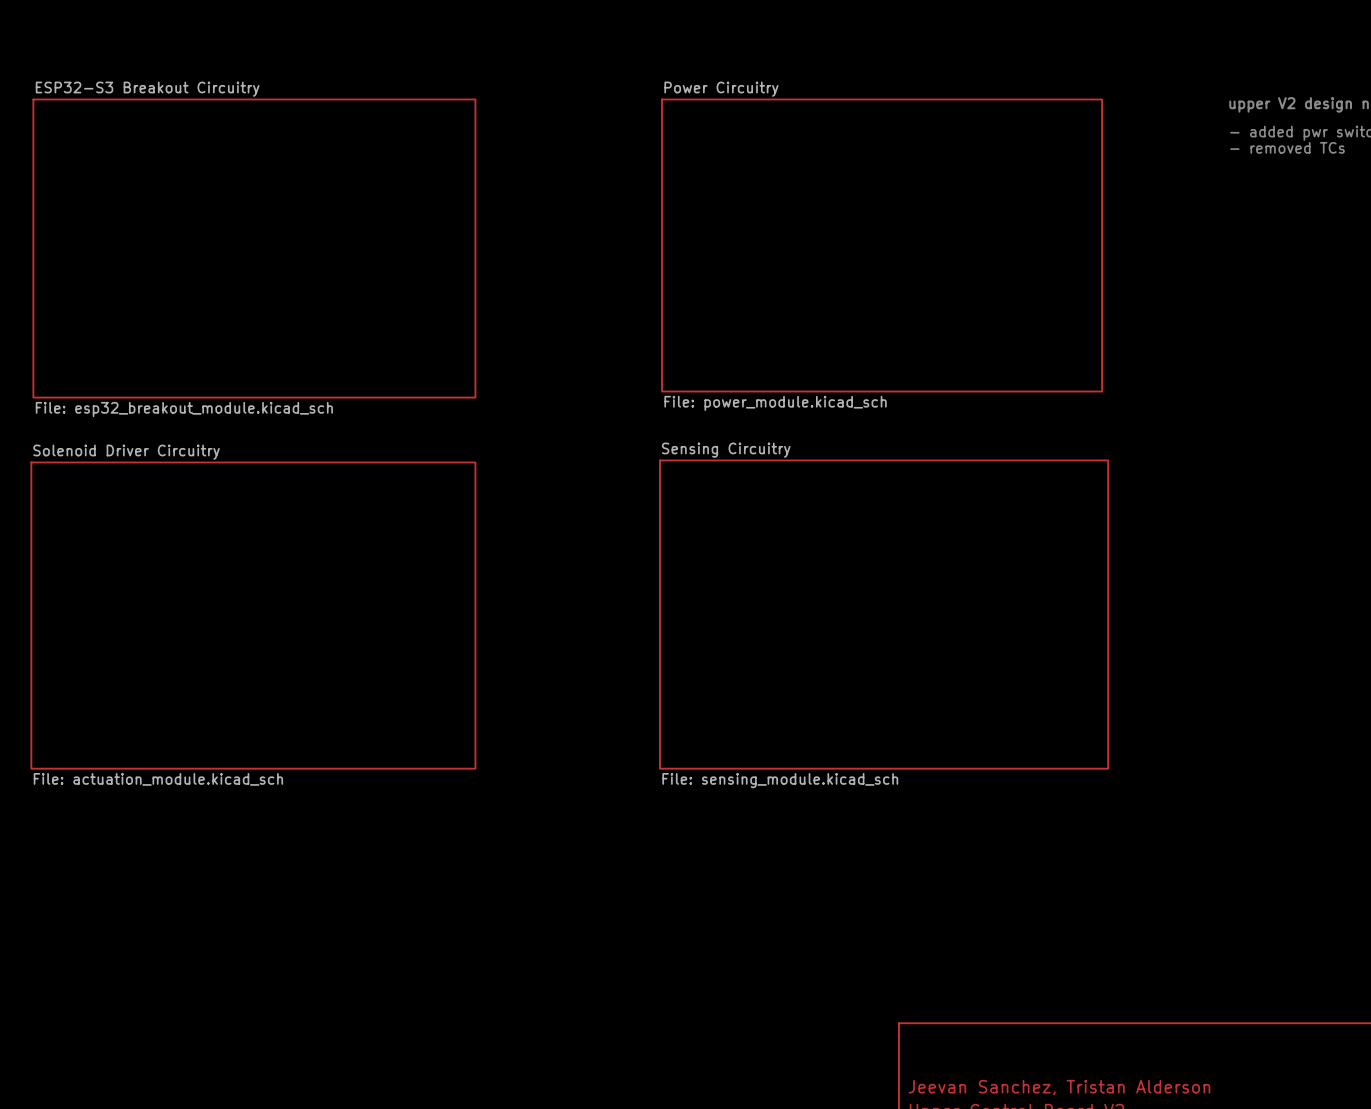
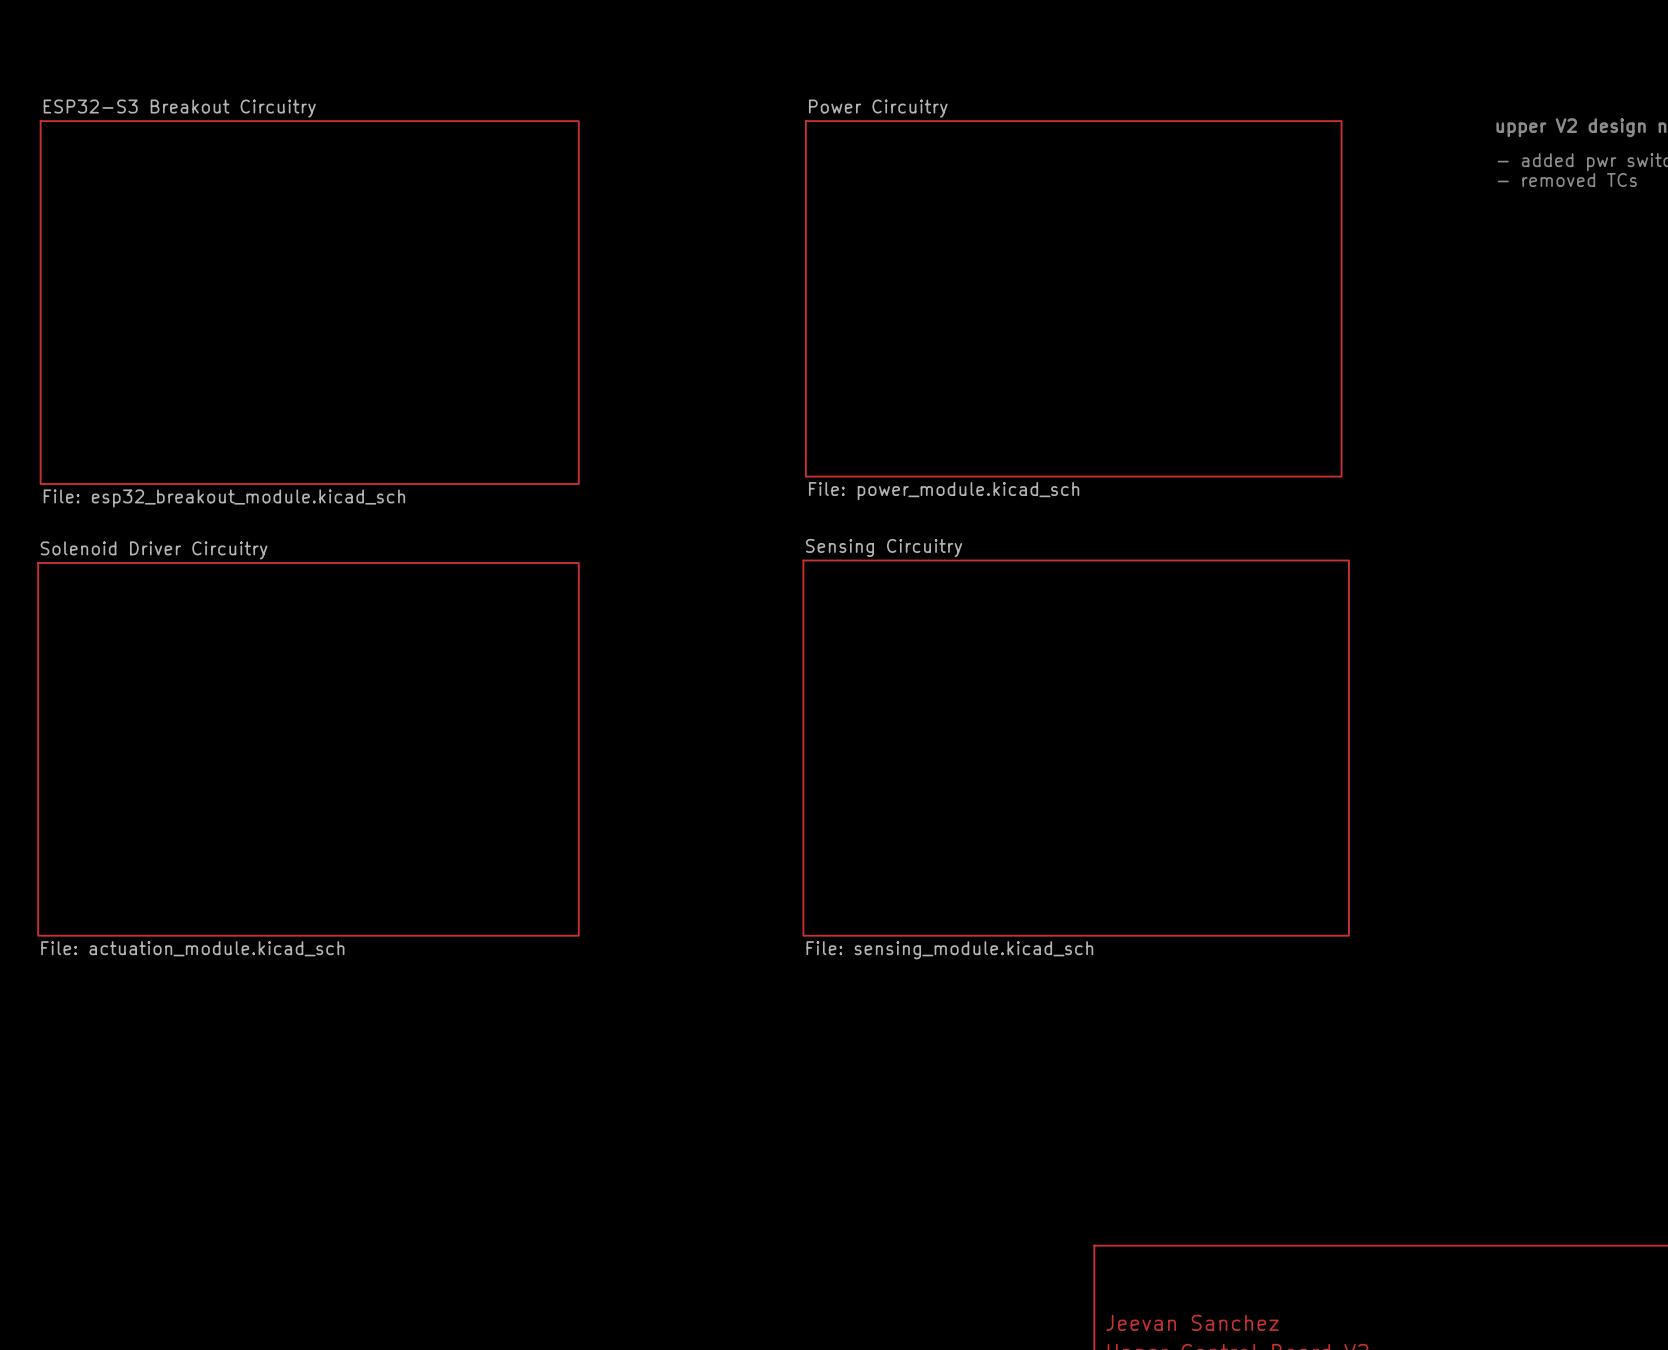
title block: Jeevan Sanchez, Tristan Alderson (1059, 1087) -> Jeevan Sanchez (1192, 1322)

